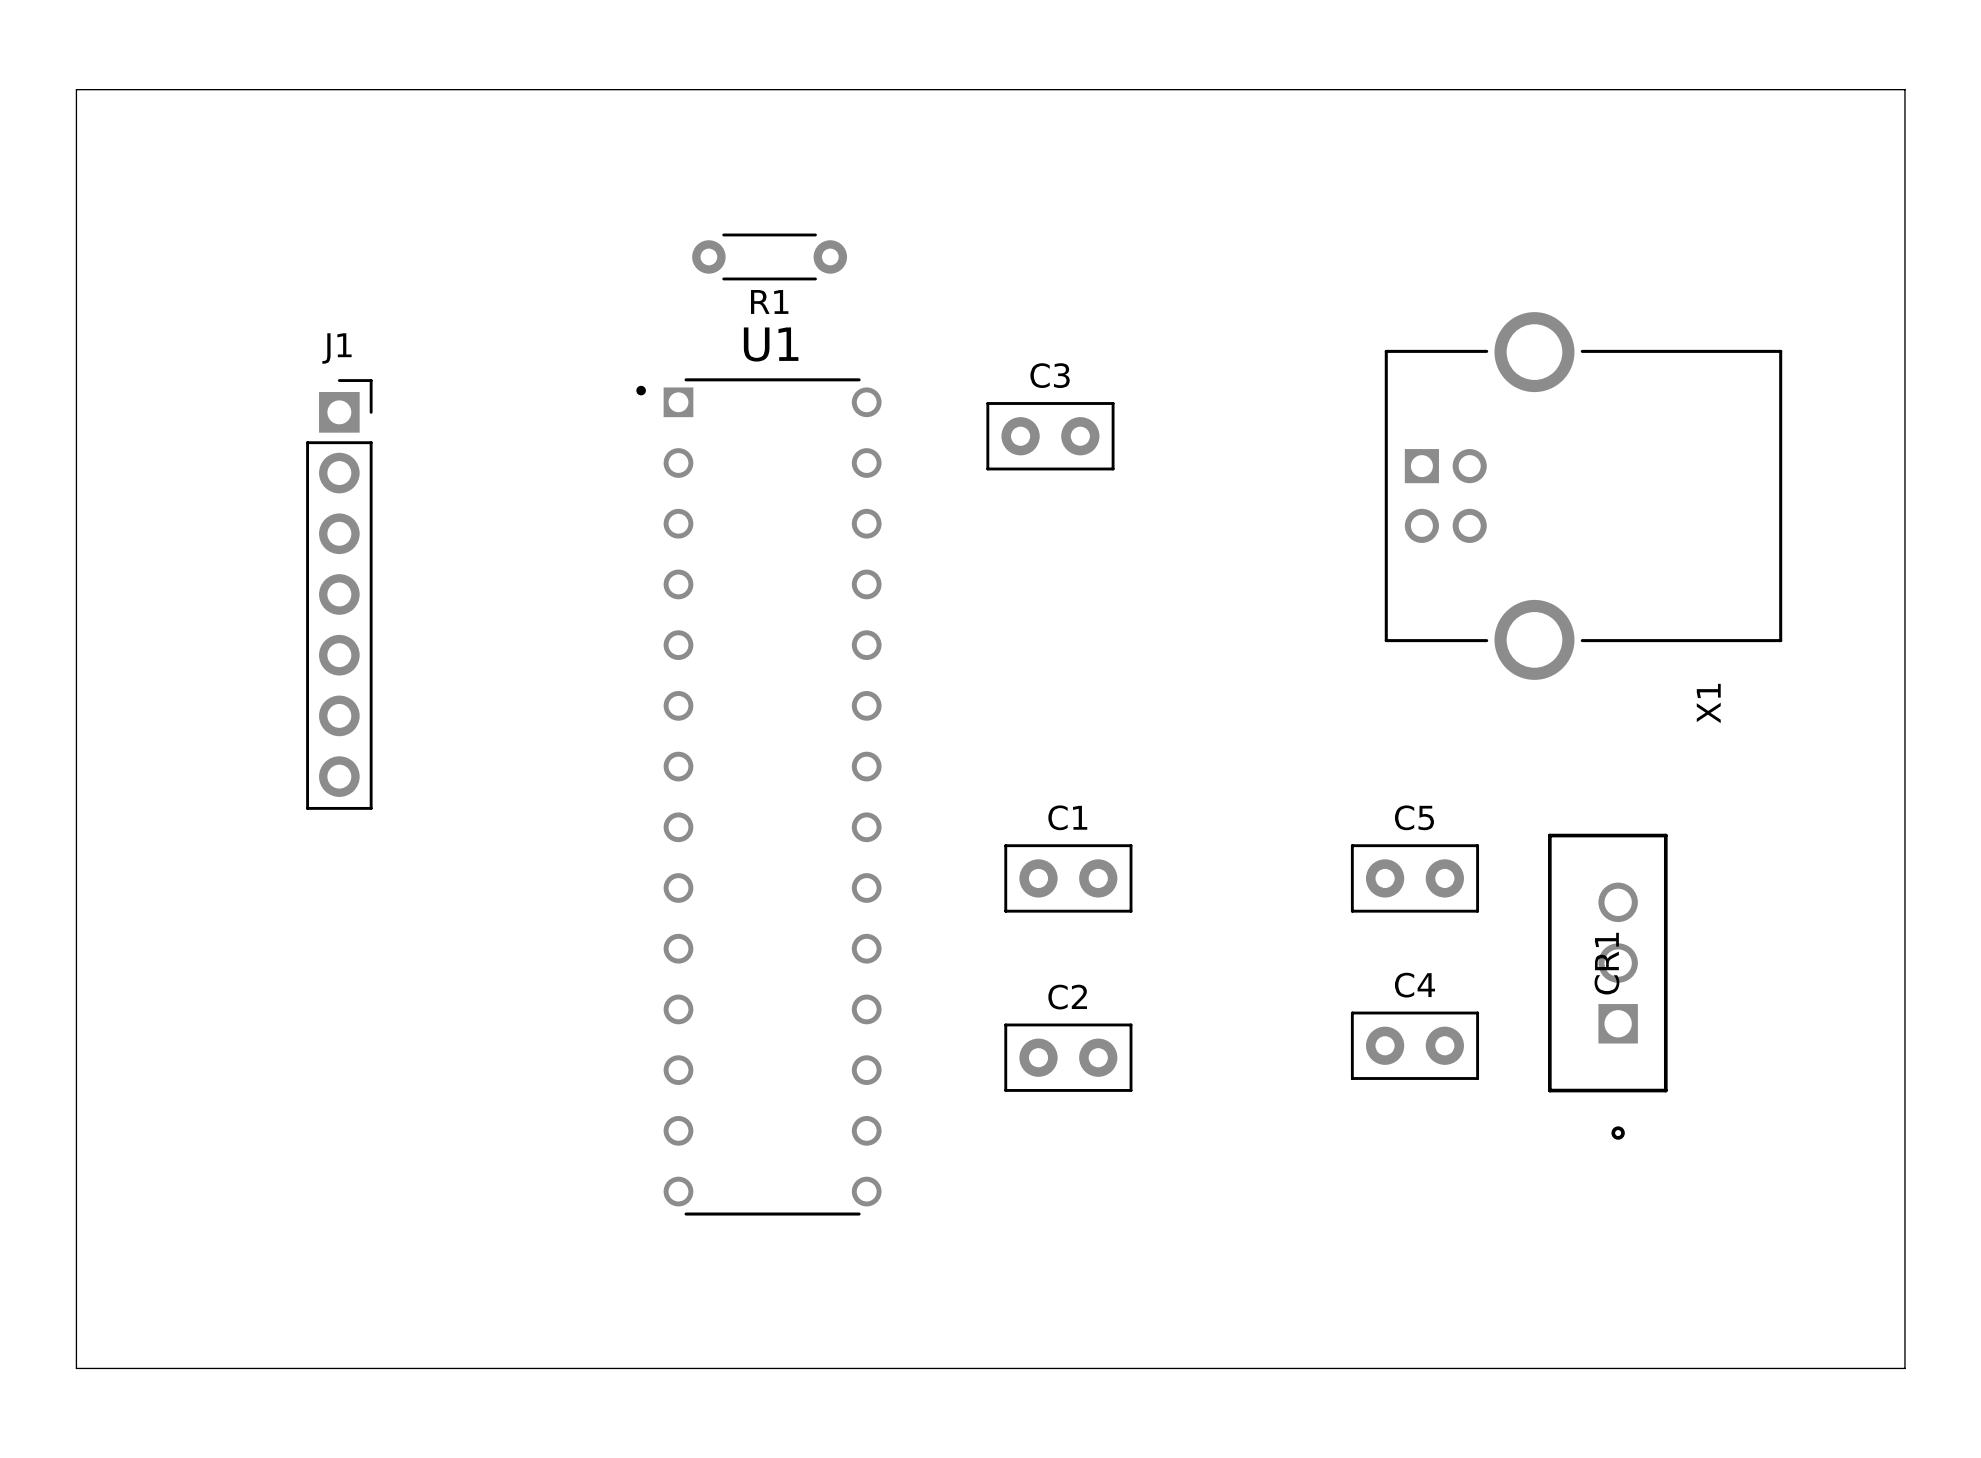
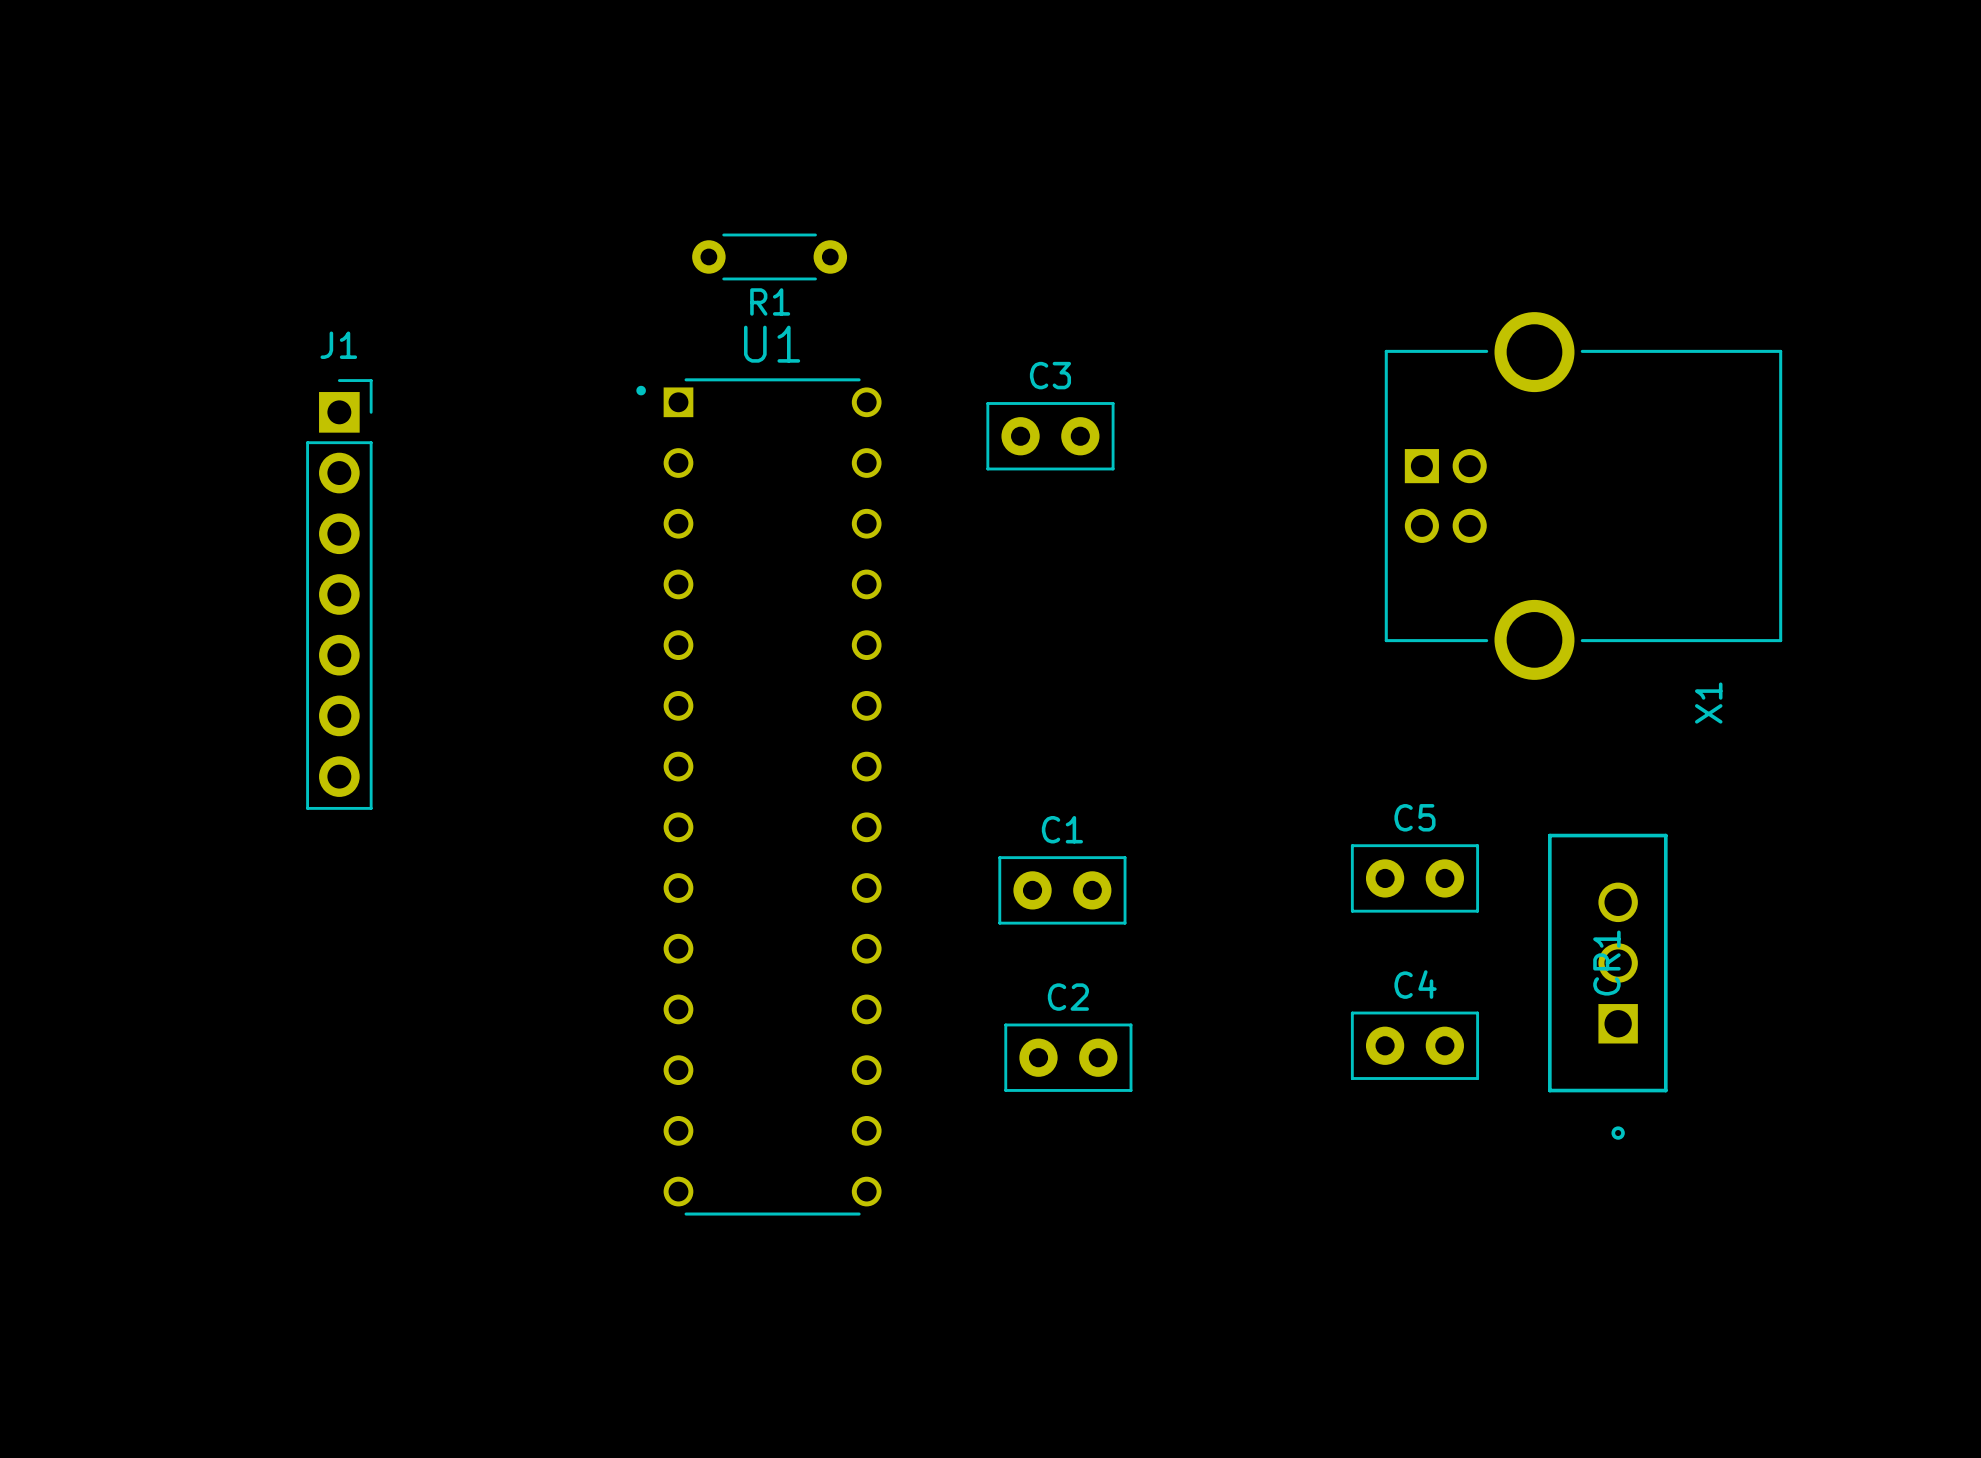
board edge: (76, 89) (1904, 89) (1904, 1368) (76, 1368) (76, 89) -> none
C1 position: (1068, 878) -> (1062, 890)

